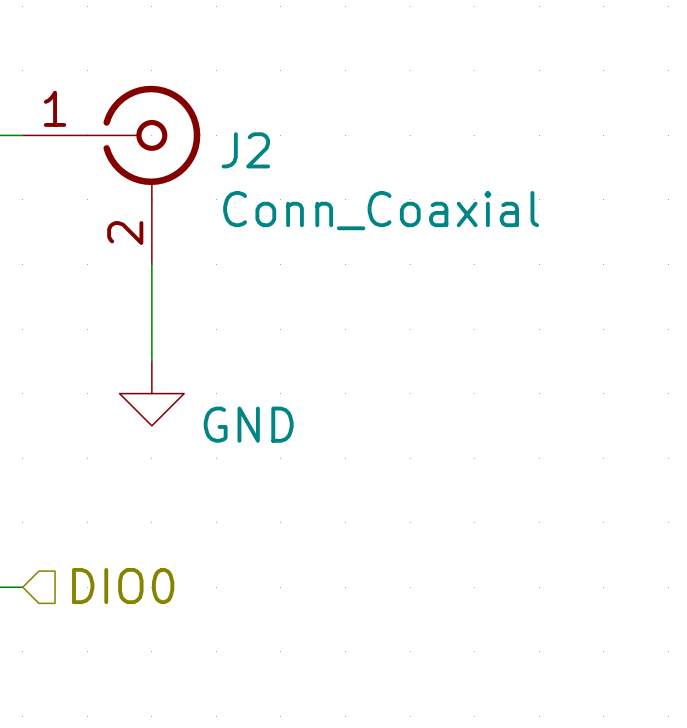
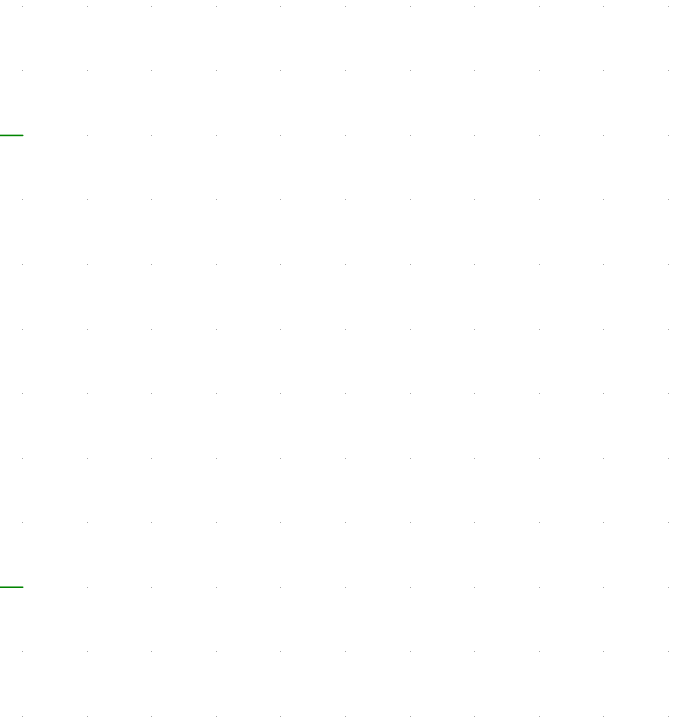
J2: Conn_Coaxial (111, 175) -> none
wire: (151, 264) (151, 361) -> none
power symbol: GND (151, 393) -> none
hierarchical label: DIO0 (123, 586) -> none

